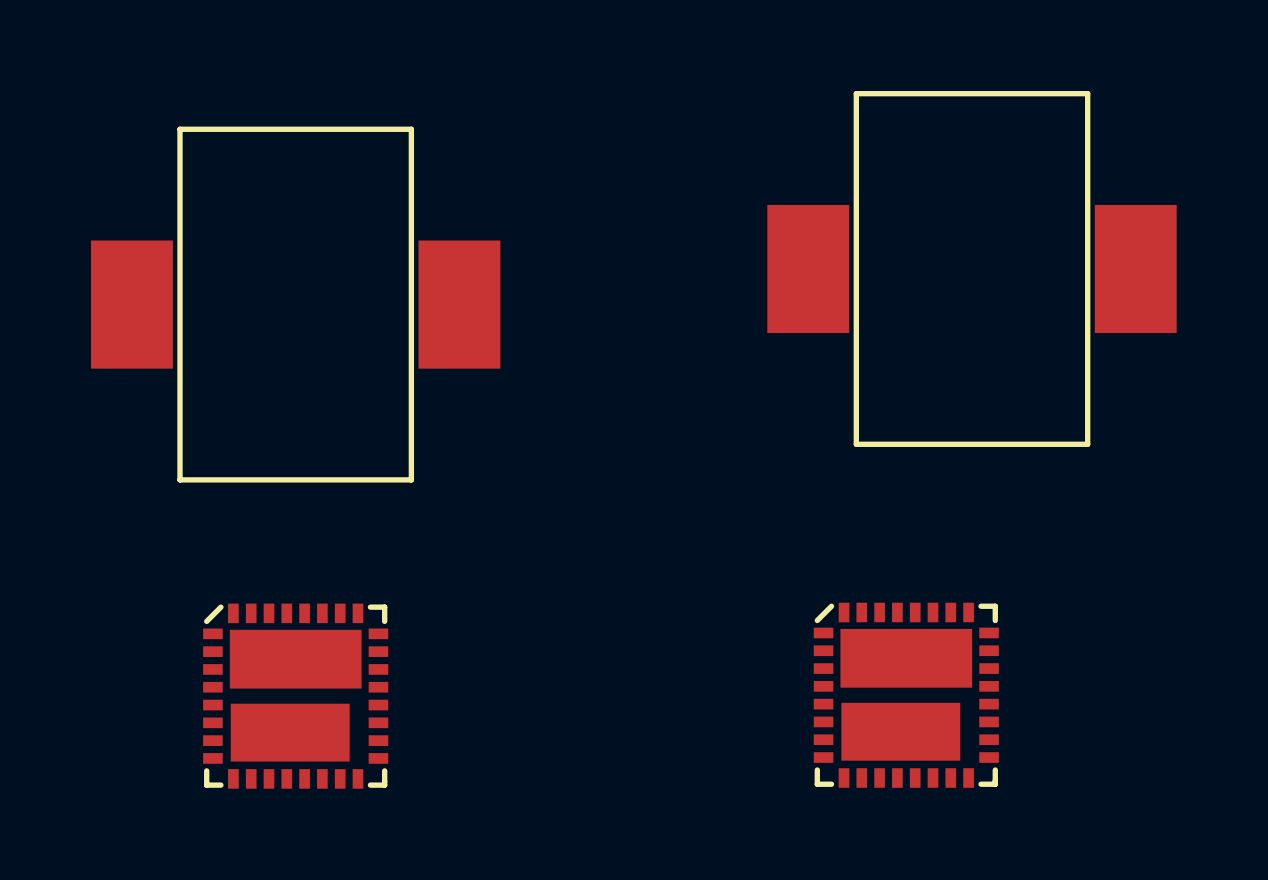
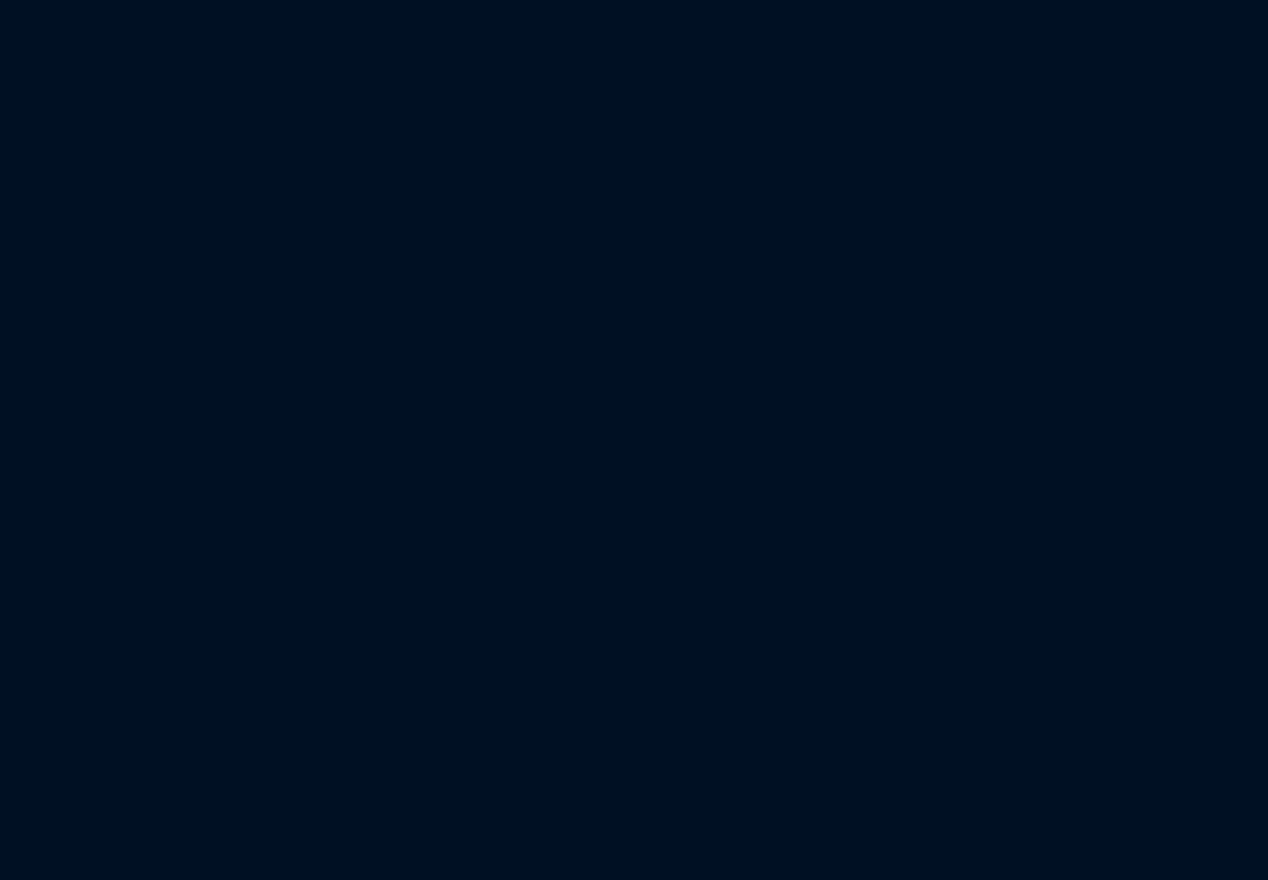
part: (972, 268) -> none
part: (295, 304) -> none
part: (906, 695) -> none
part: (295, 696) -> none

